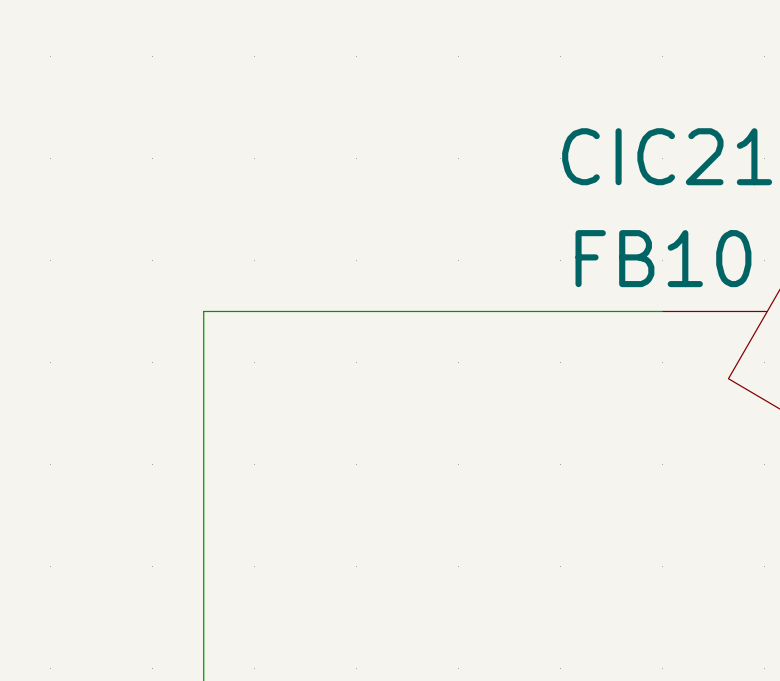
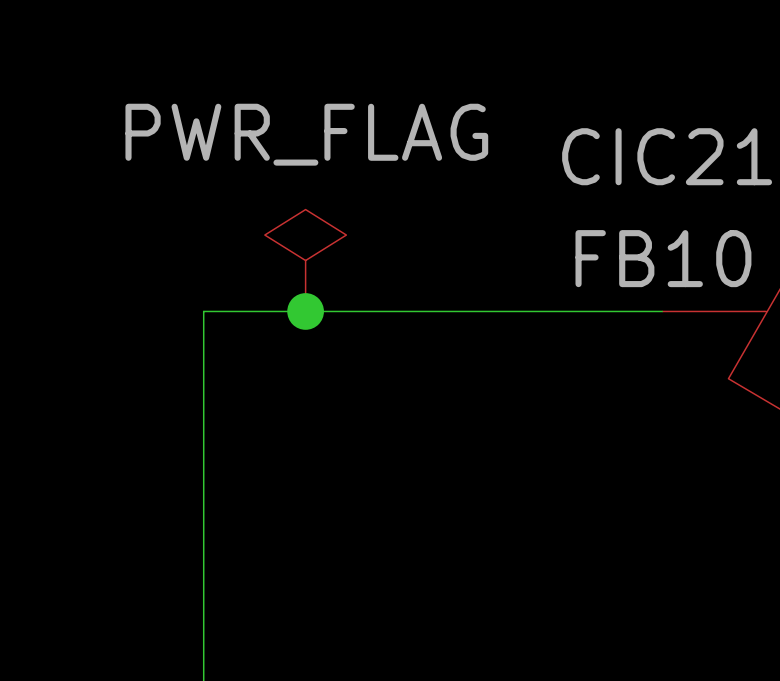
power symbol: none -> PWR_FLAG (305, 260)
junction: none -> (305, 311)

